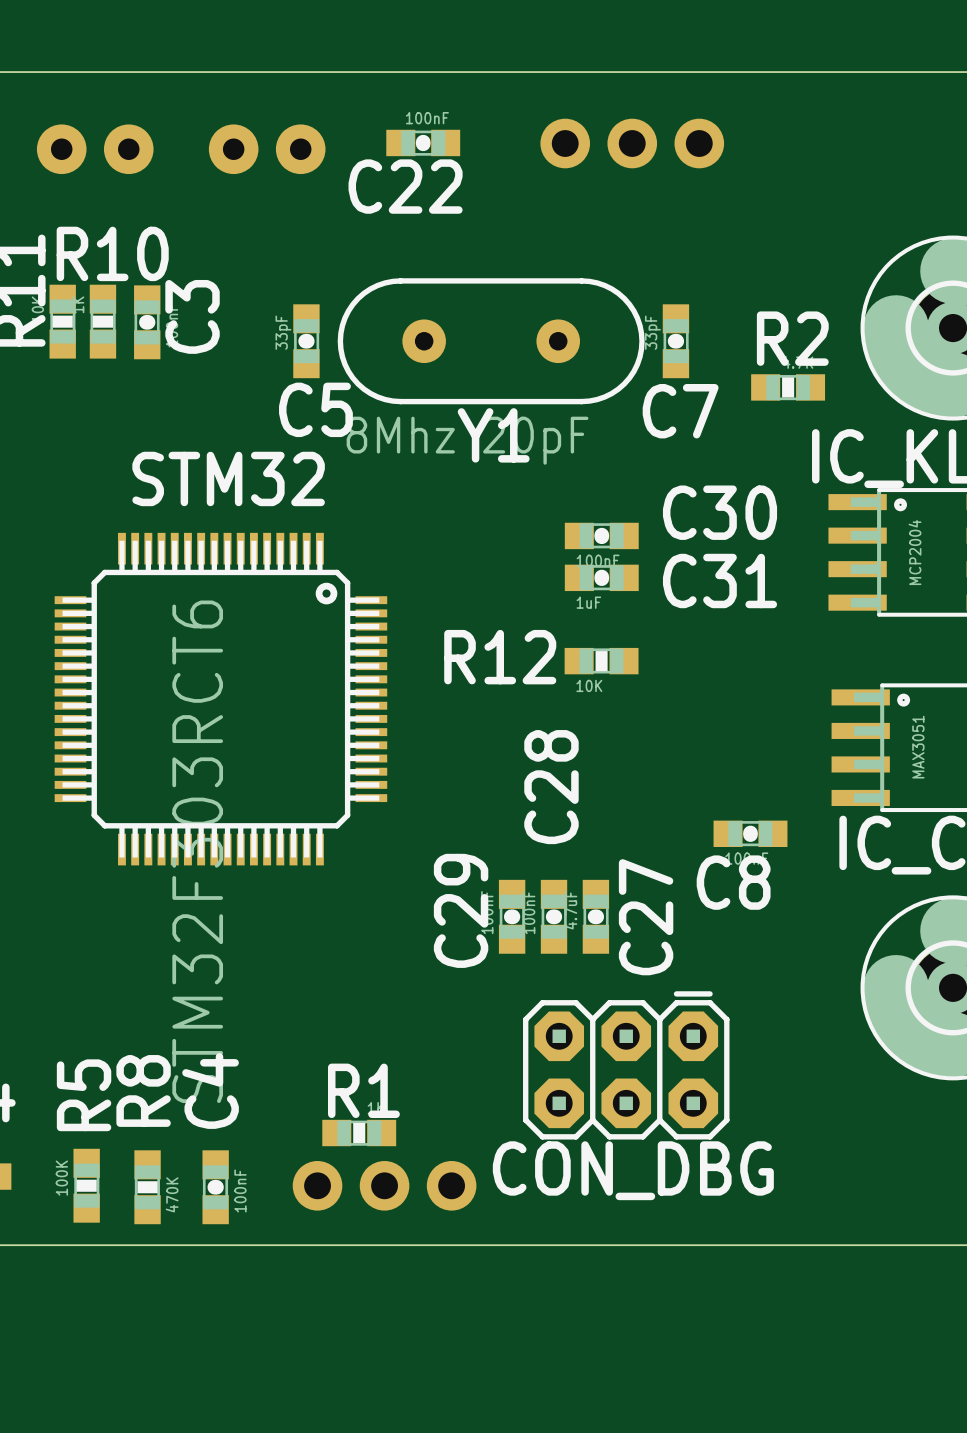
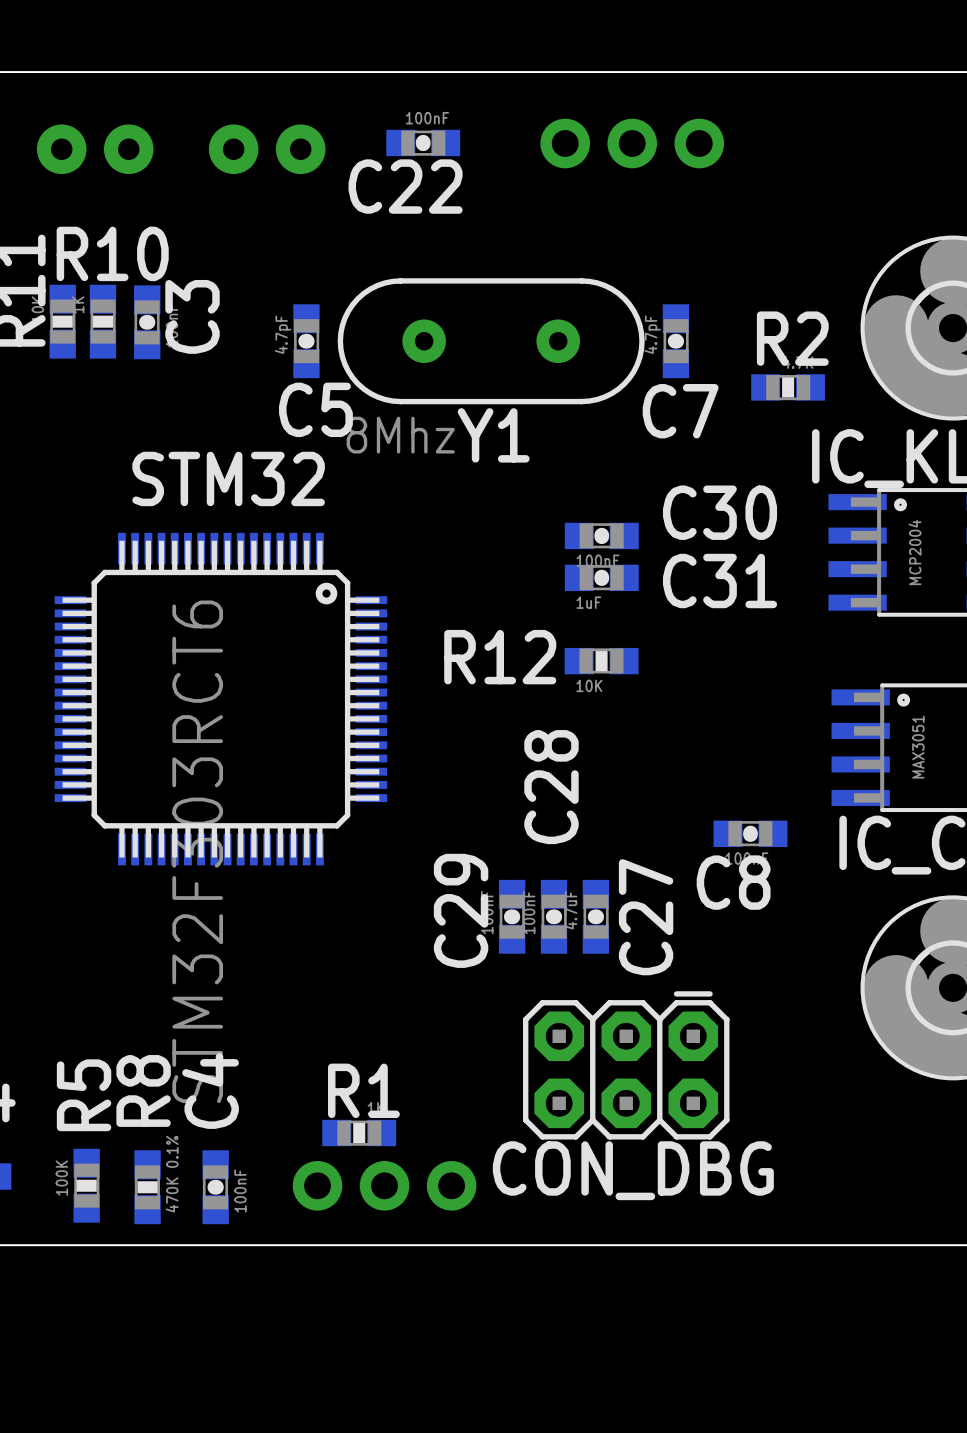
C5 value: 33pF (283, 332) -> 4.7pF (283, 334)
C7 value: 33pF (652, 332) -> 4.7pF (652, 334)
Y1 value: 8Mhz 20pF (467, 440) -> 8Mhz (400, 435)
R8 value: 470K (172, 1194) -> 470K 0.1% (172, 1174)

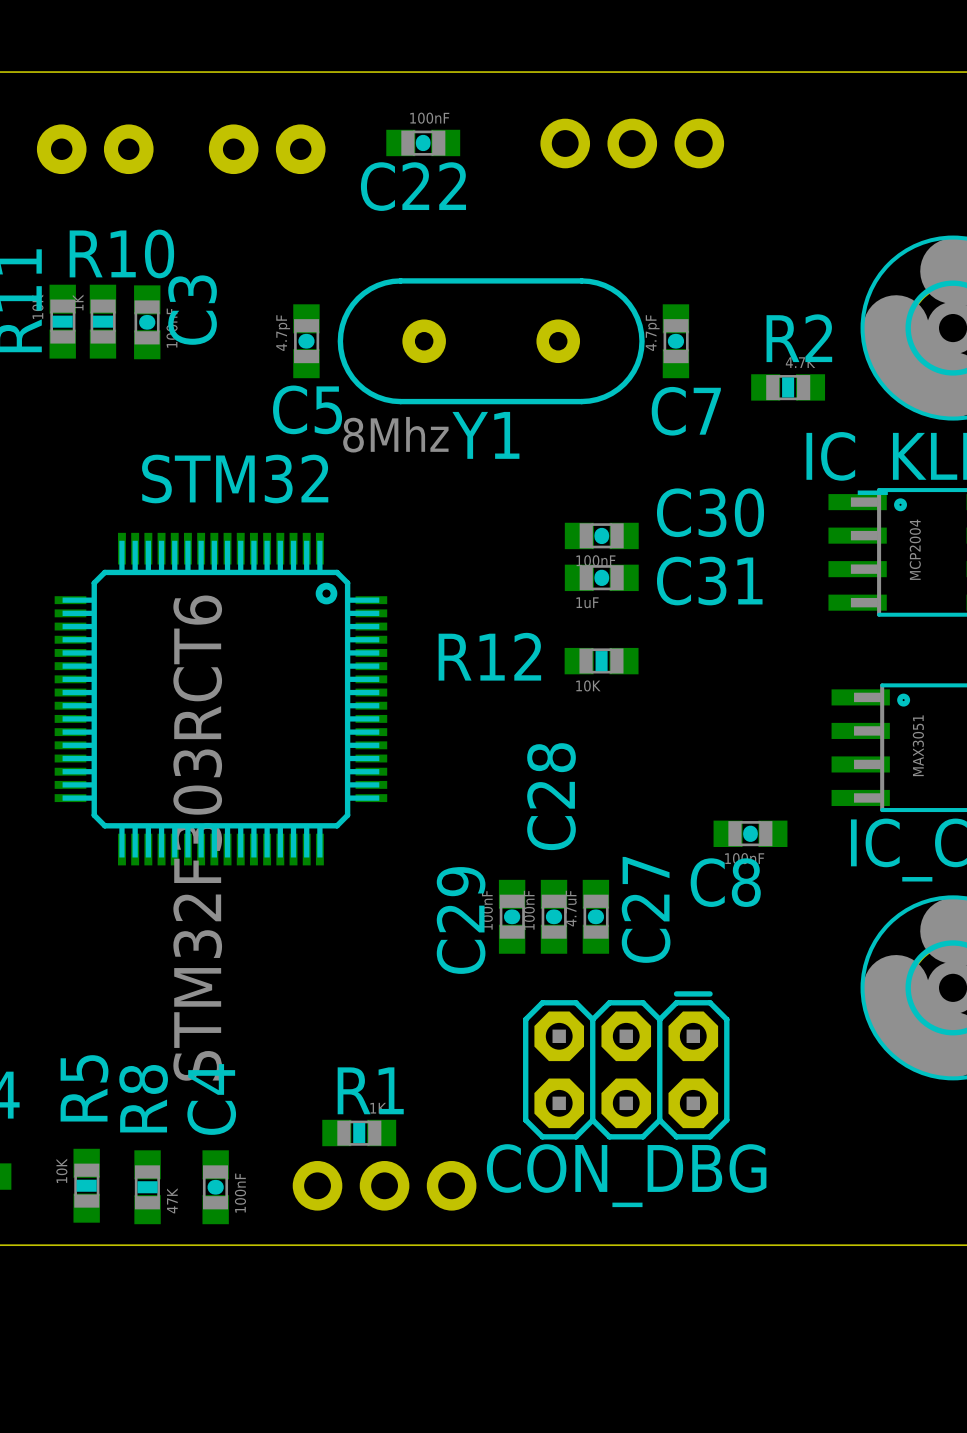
R8 value: 470K 0.1% (172, 1174) -> 47K (172, 1200)
R5 value: 100K (61, 1178) -> 10K (61, 1170)

